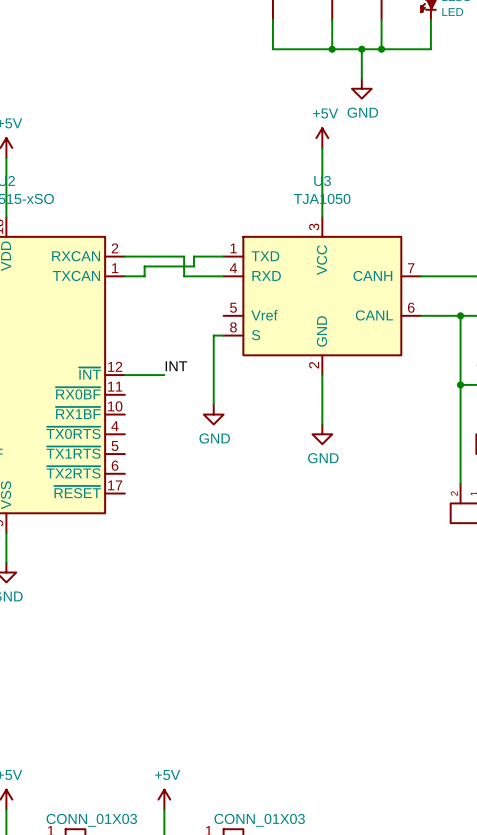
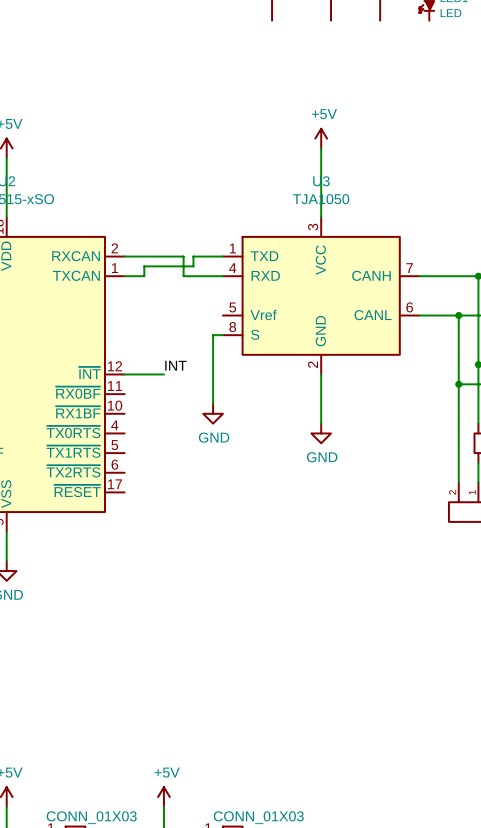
wire: (272, 19) (272, 49) (430, 49) (430, 19) -> none
wire: (332, 19) (332, 49) -> none
wire: (381, 19) (381, 49) -> none
junction: (332, 49) -> none
wire: (361, 49) (361, 78) -> none
junction: (361, 49) -> none
junction: (381, 49) -> none
power symbol: GND (361, 88) -> none

